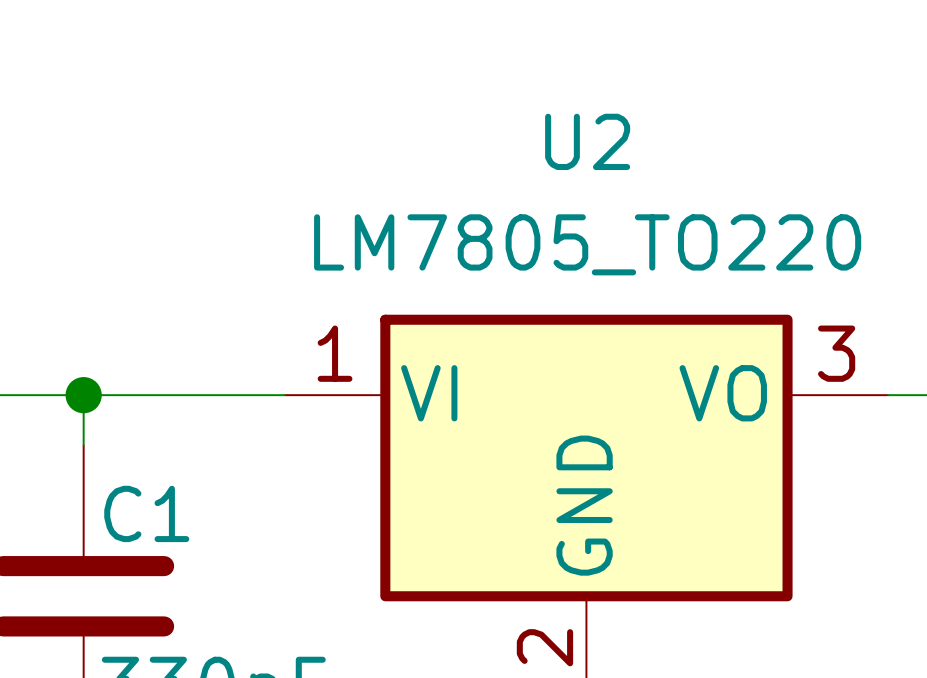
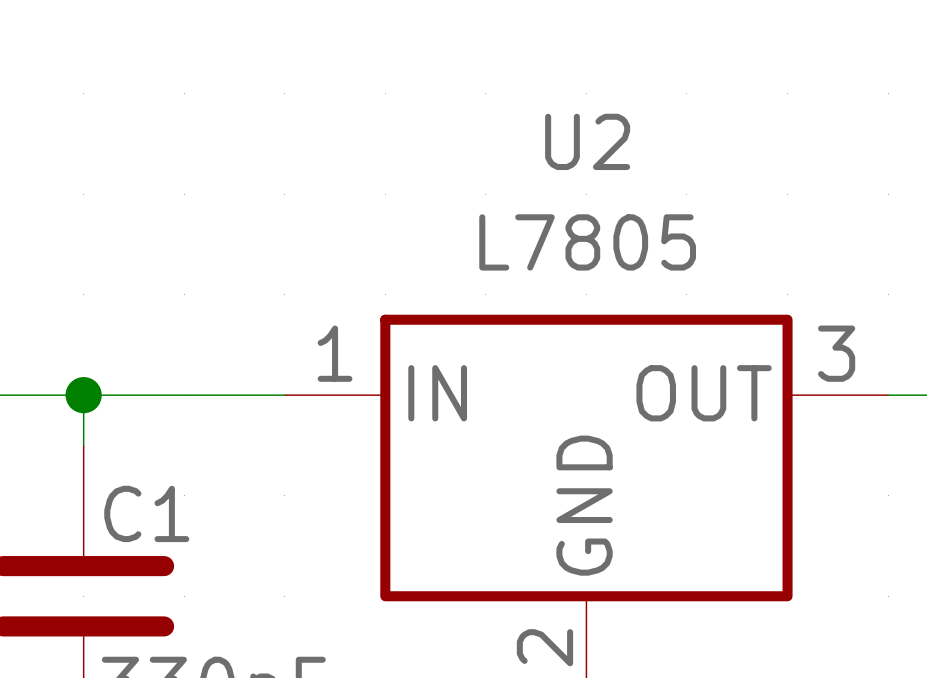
U2 value: LM7805_TO220 (587, 244) -> L7805 (587, 242)
U2 pin name: VI (429, 393) -> IN (437, 393)
U2 pin name: VO (723, 393) -> OUT (704, 393)

